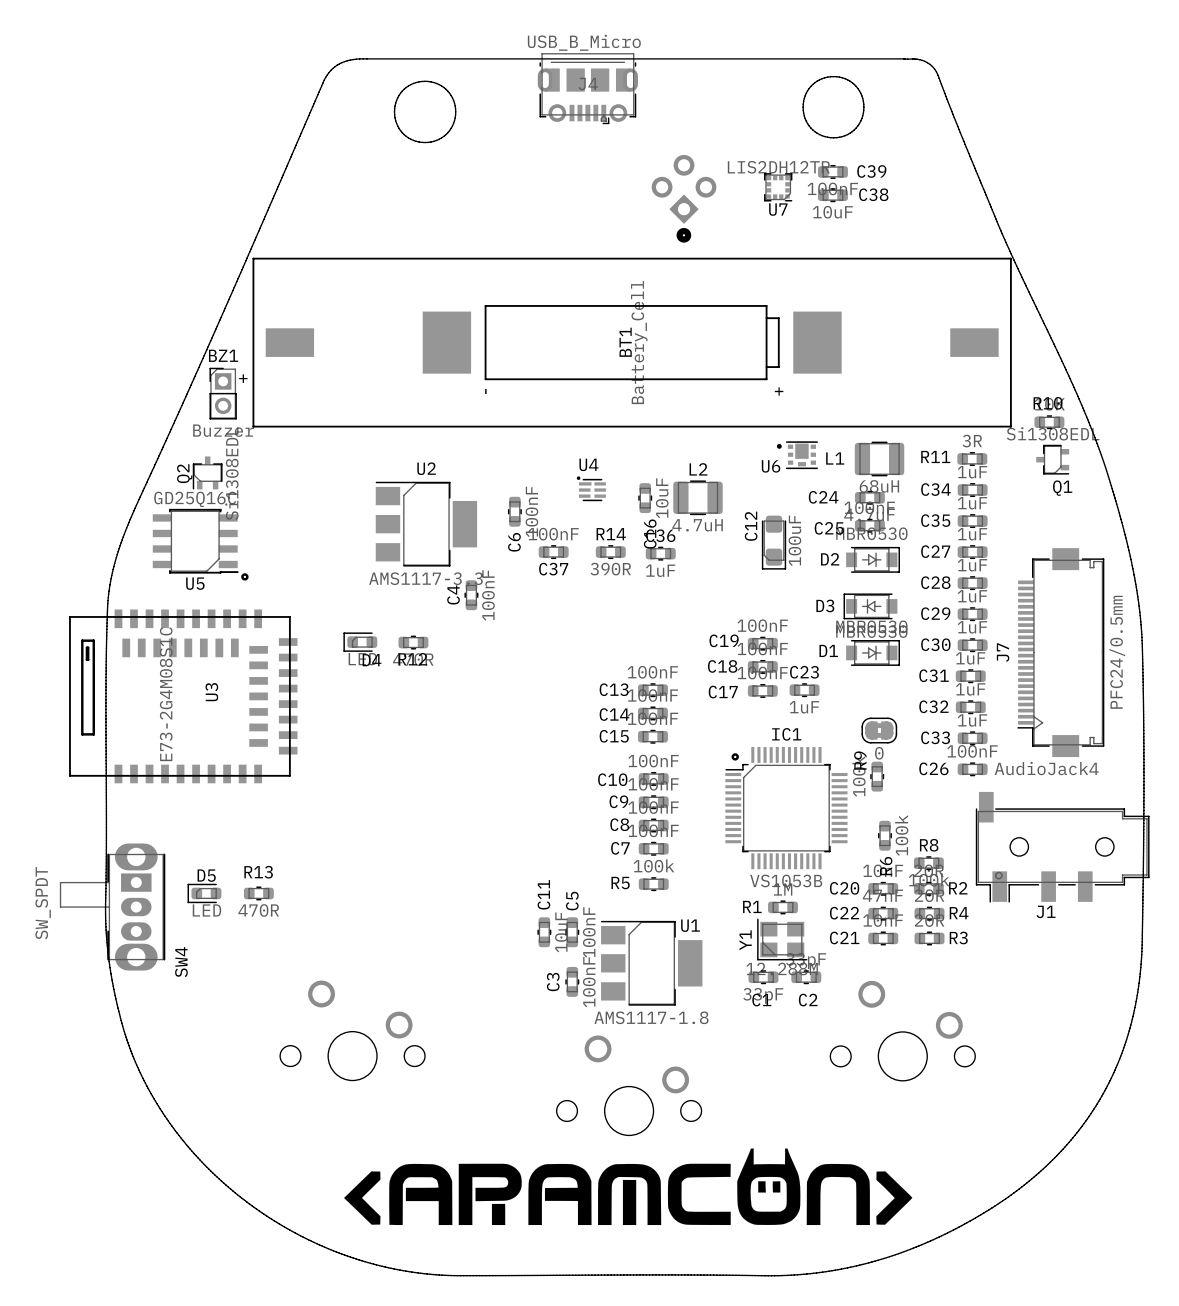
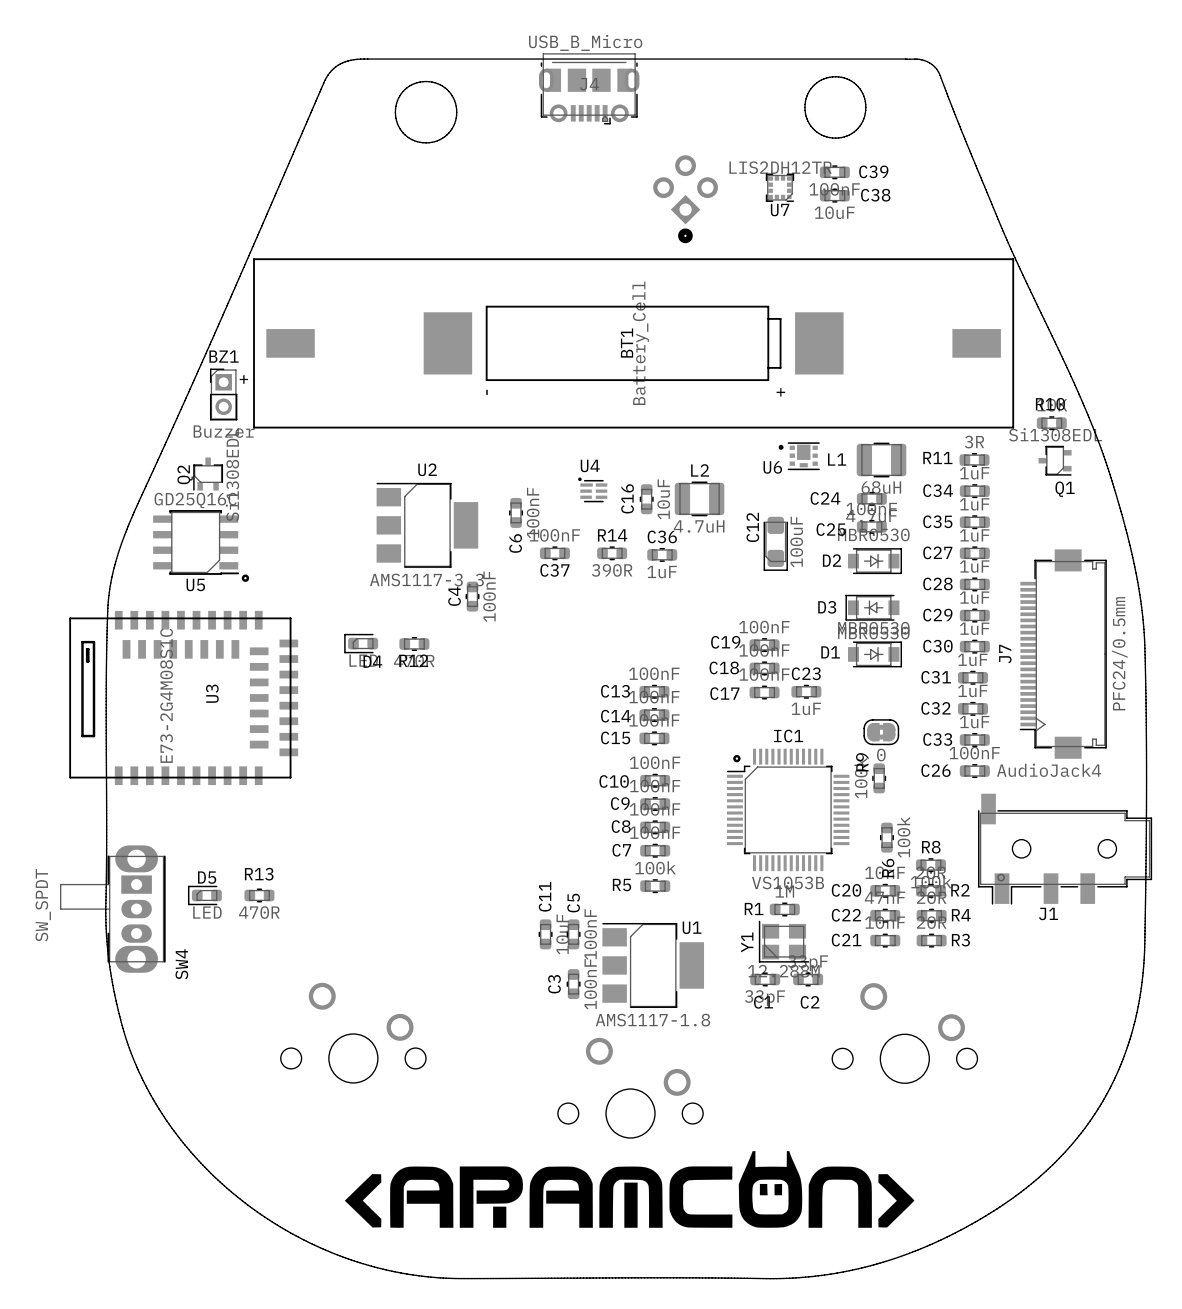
C16 name position: C16 (650, 534) -> C16 (627, 498)

